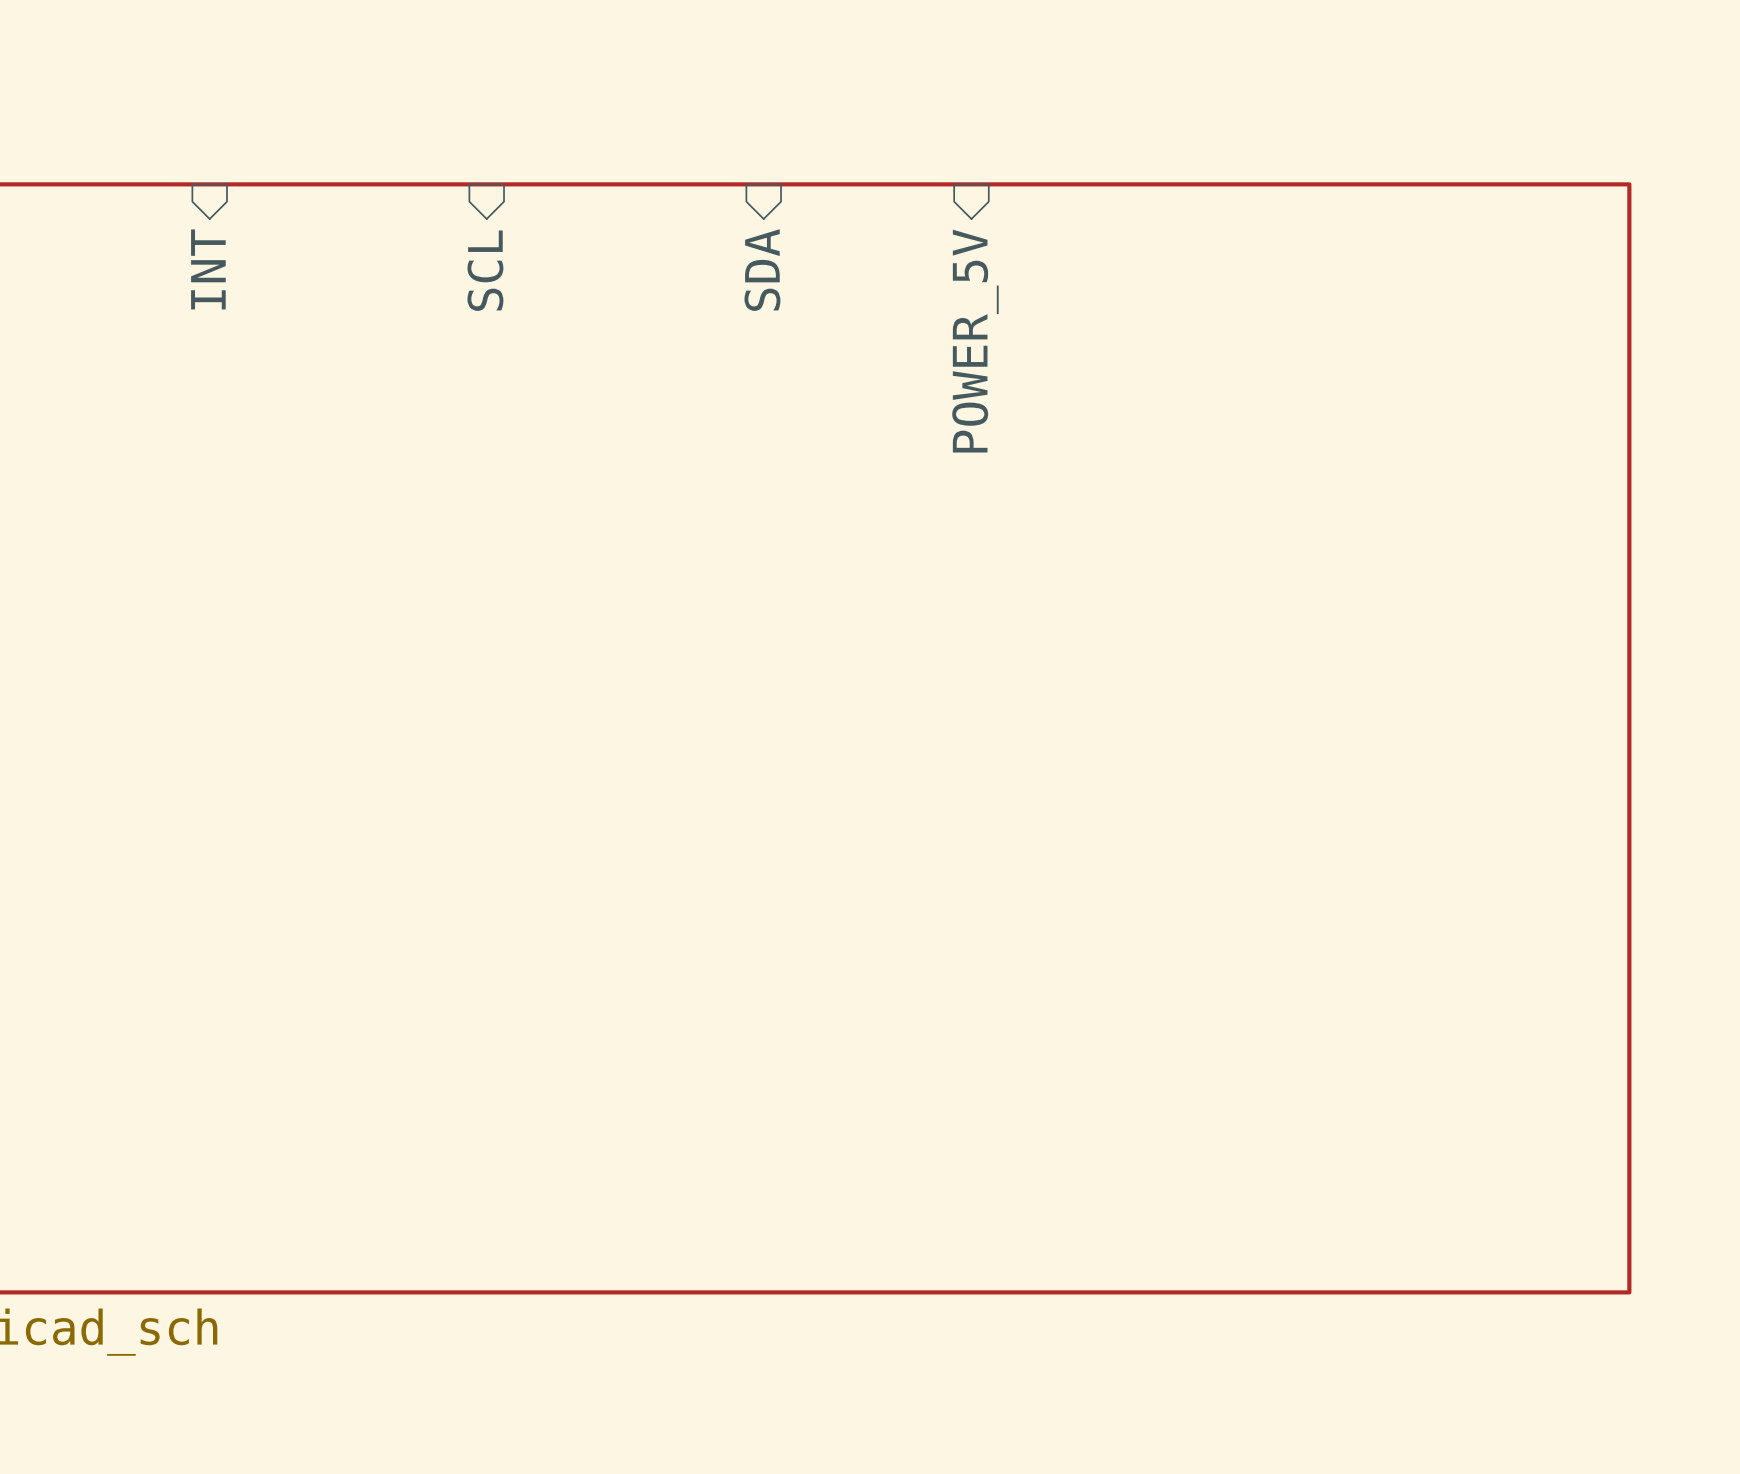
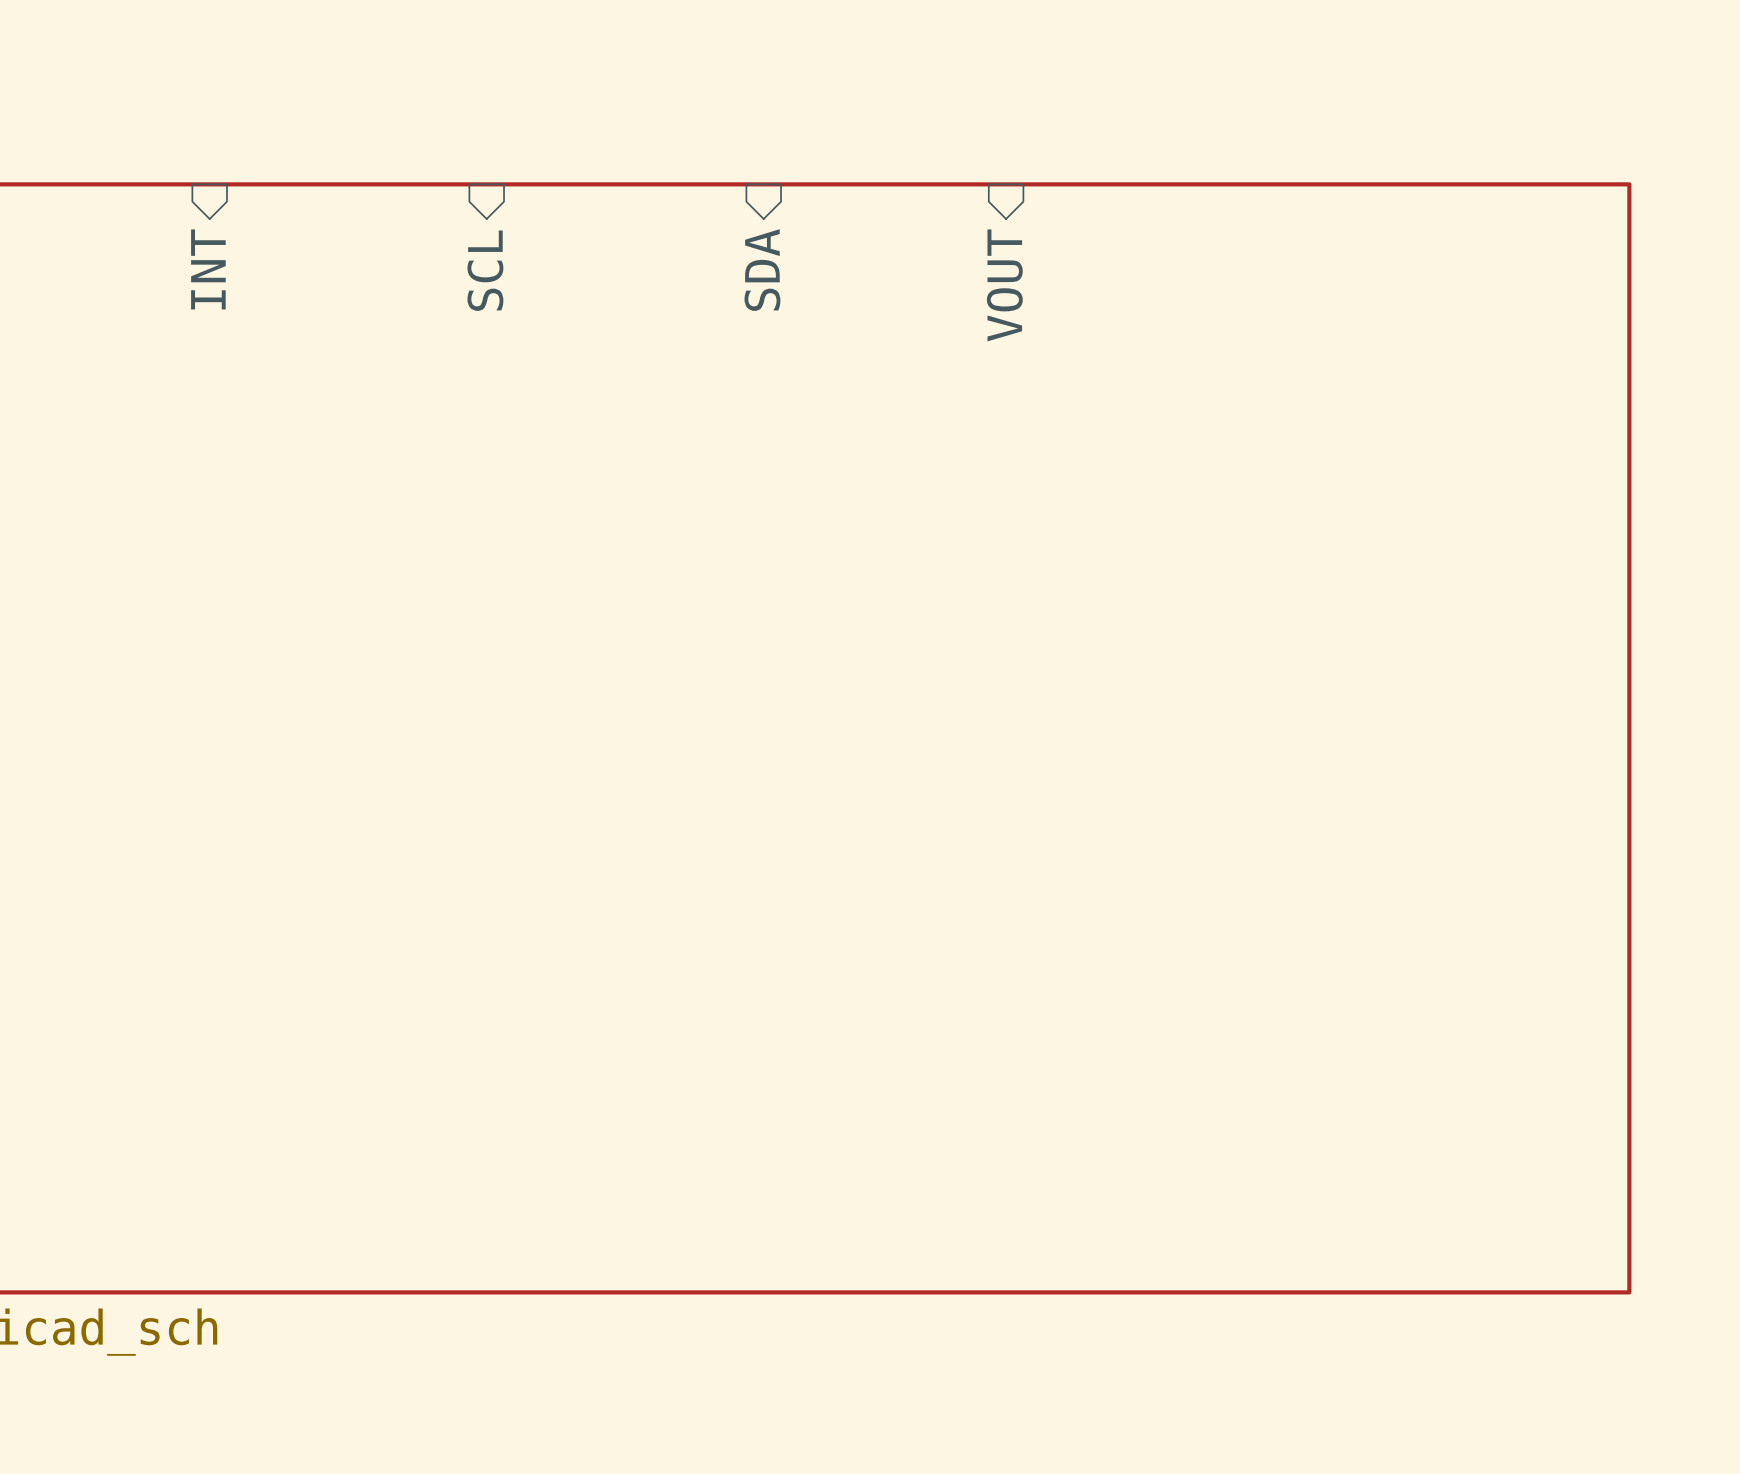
sheet pin: none -> VOUT (1004, 285)
sheet pin: POWER_5V (975, 341) -> none

